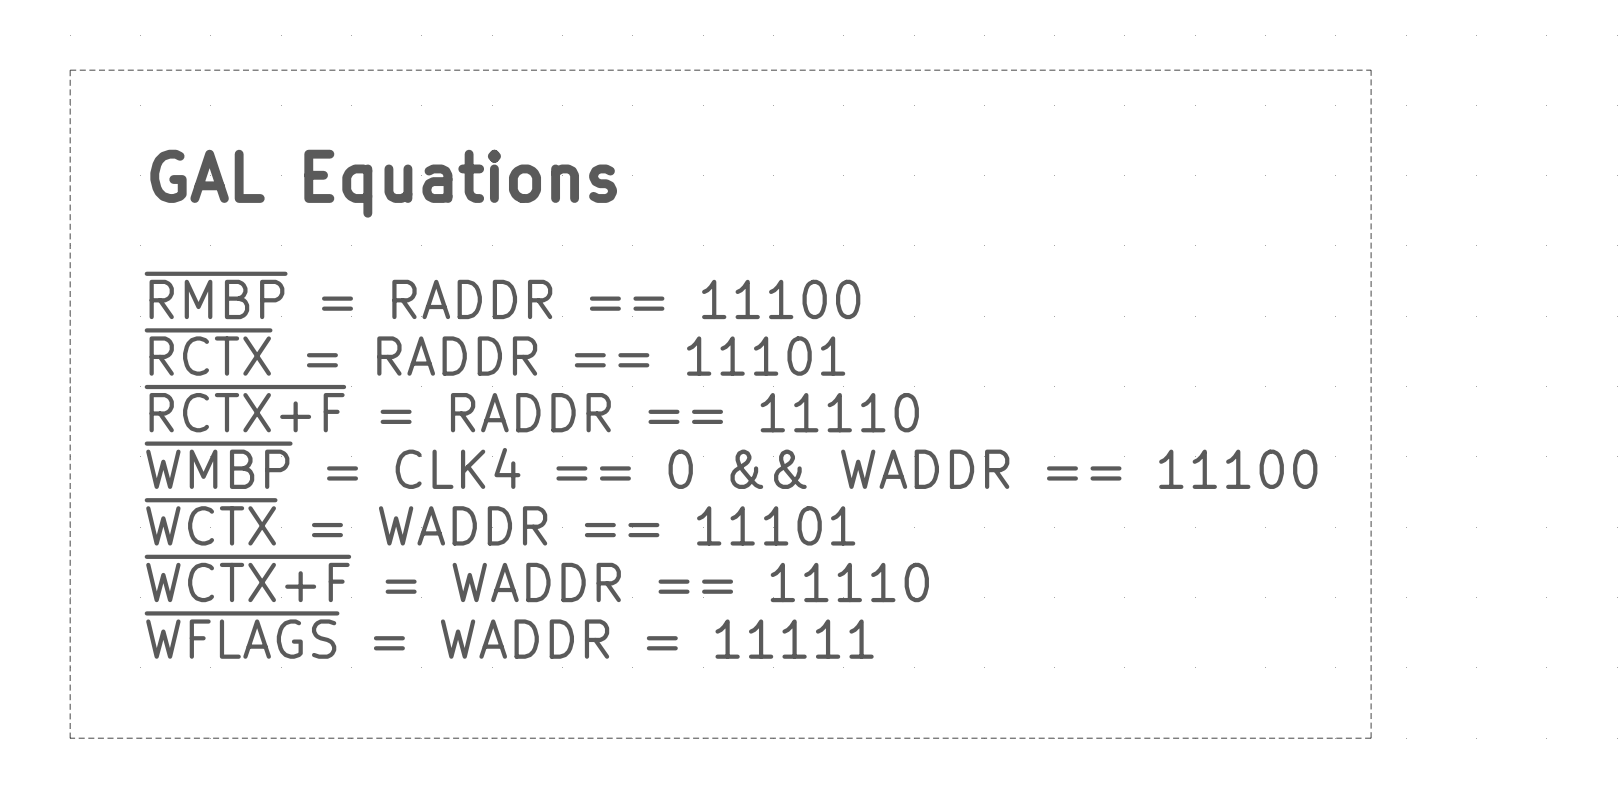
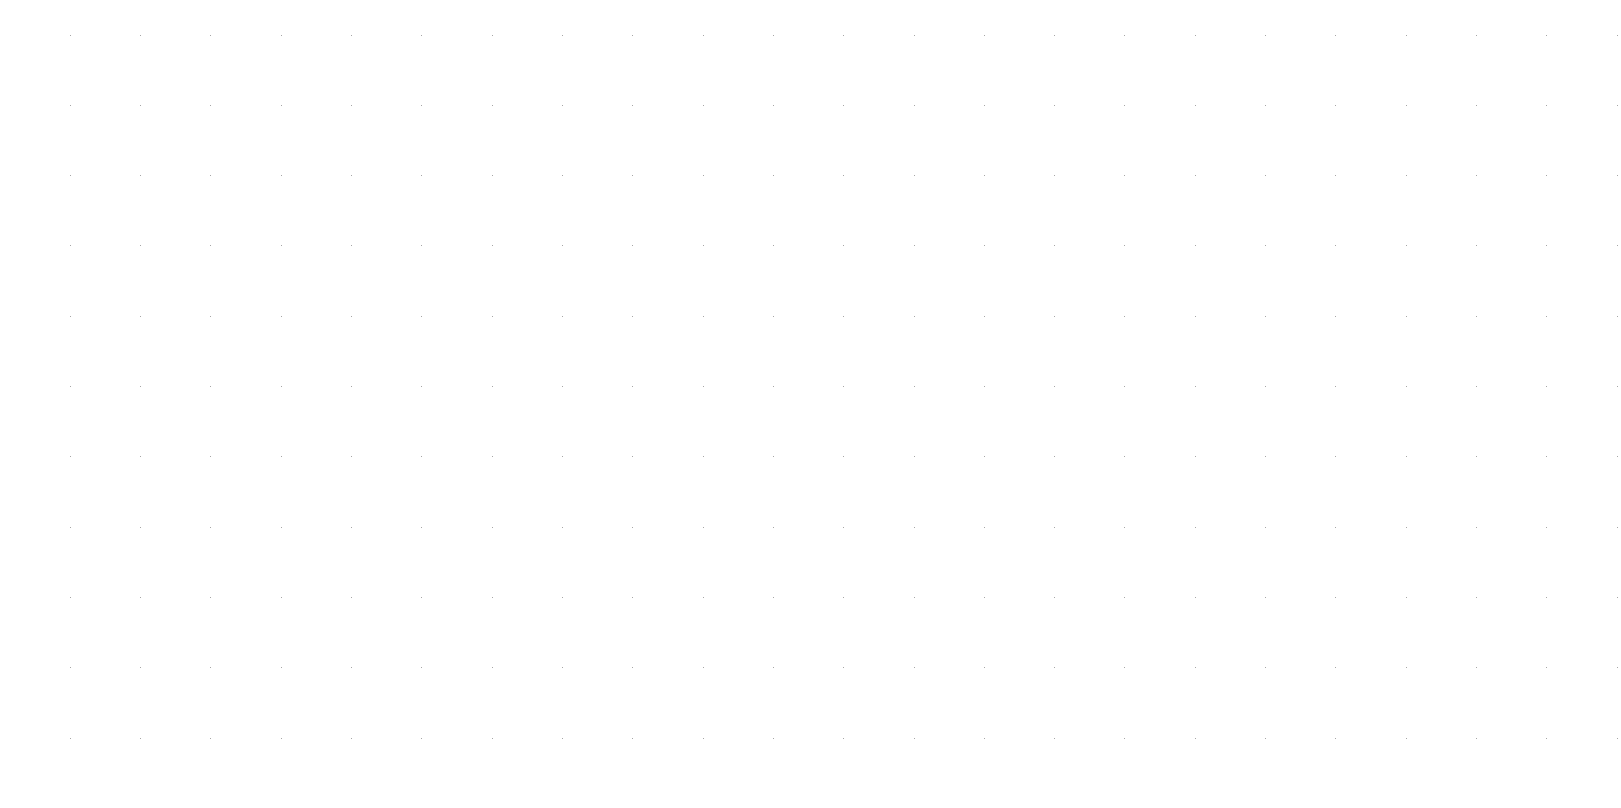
line: (70, 70) (70, 738) (1371, 738) (1371, 70) (70, 70) -> none
text: GAL Equations (383, 183) -> none
text: ~{RMBP} = RADDR == 11100 (502, 295) -> none
text: ~{RCTX} = RADDR == 11101 (494, 352) -> none
text: ~{RCTX+F} = RADDR == 11110 (531, 408) -> none
text: ~{WMBP} = CLK4 == 0 && WADDR == 11100 (731, 465) -> none
text: ~{WCTX} = WADDR == 11101 (499, 521) -> none
text: ~{WCTX+F} = WADDR == 11110 (536, 578) -> none
text: ~{WFLAGS} = WADDR = 11111 (509, 635) -> none

